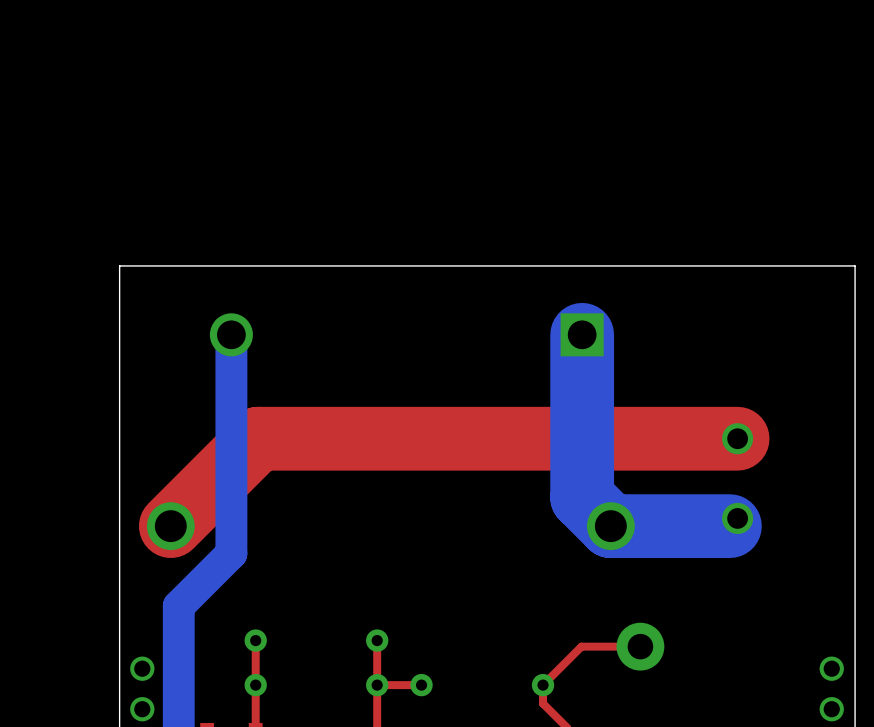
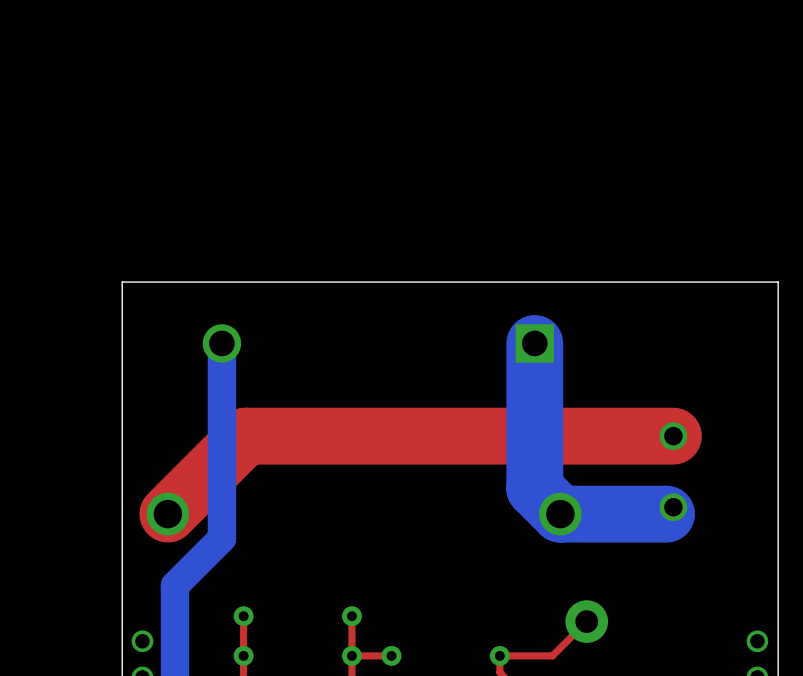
top track: (640, 646) (581, 646) (543, 685) -> (586, 621) (552, 655) (499, 655)

